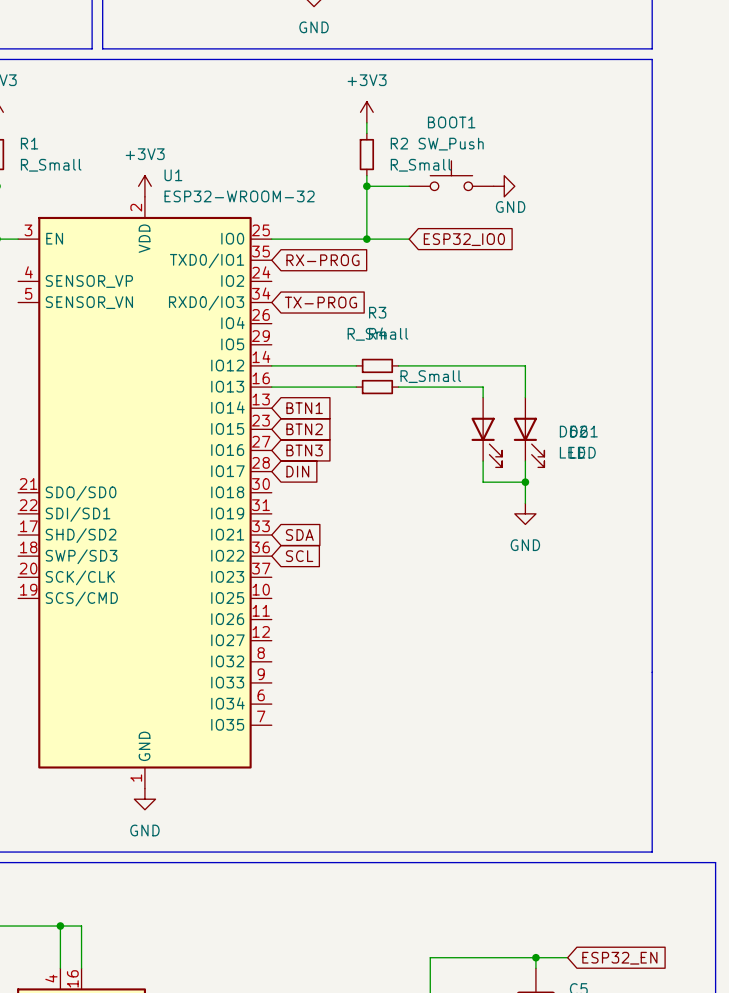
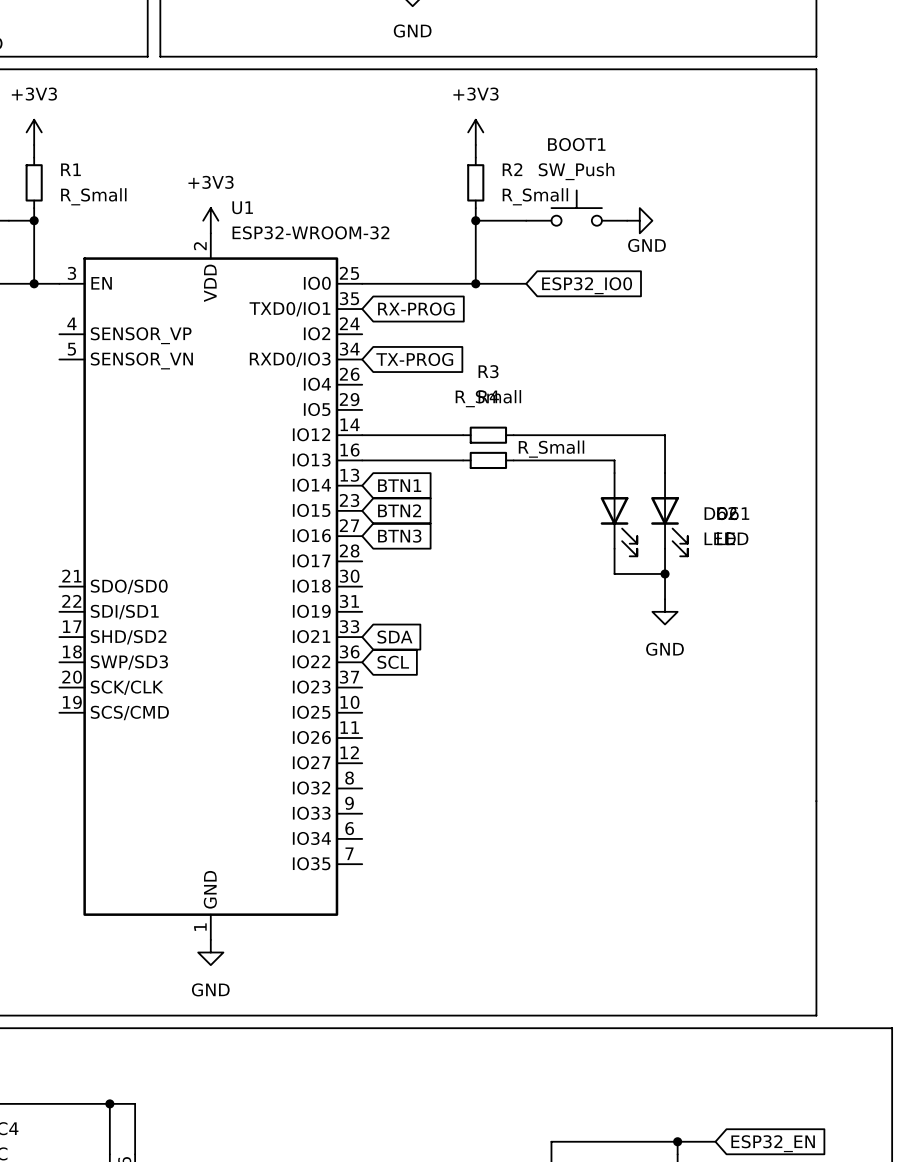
global label: DIN (297, 471) -> none

